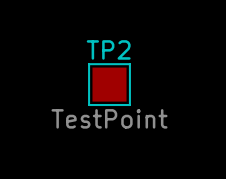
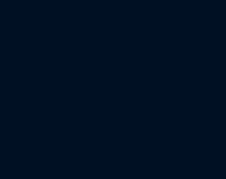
TP2: TestPoint (109, 84) -> none

